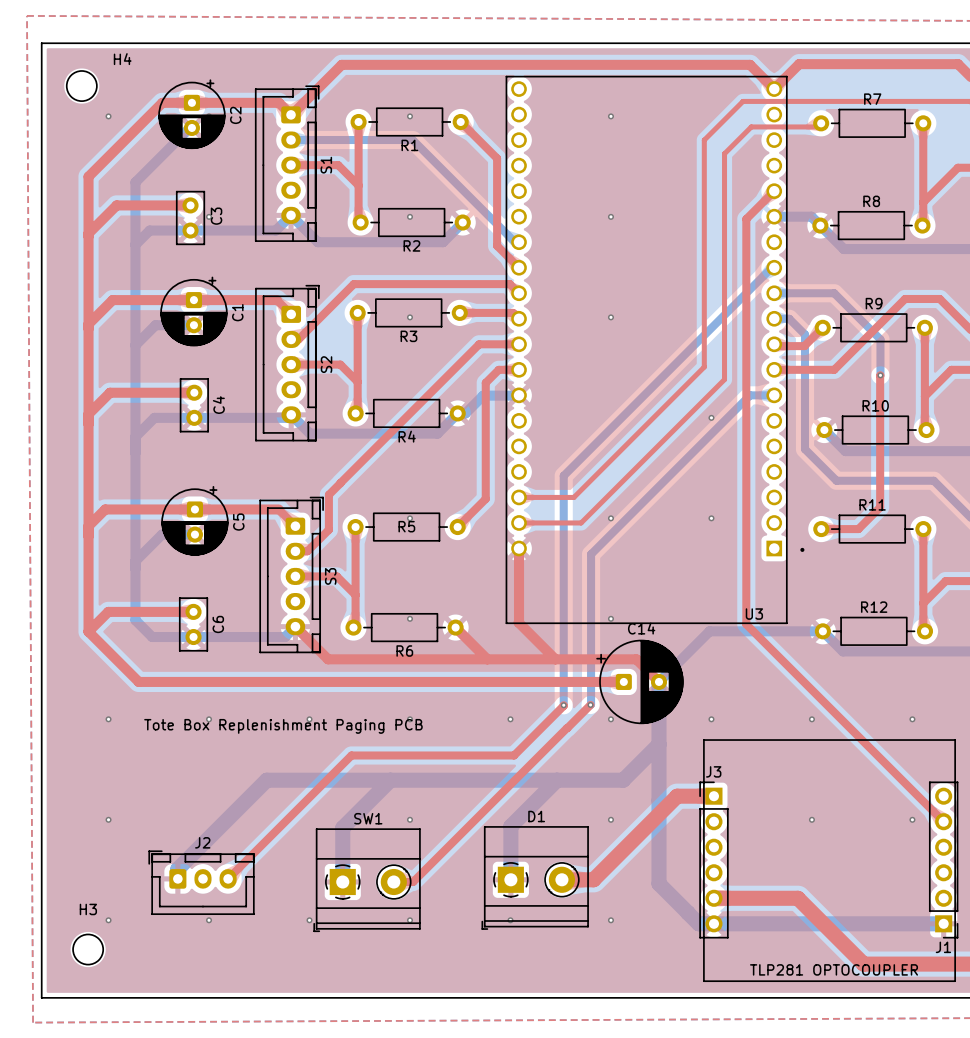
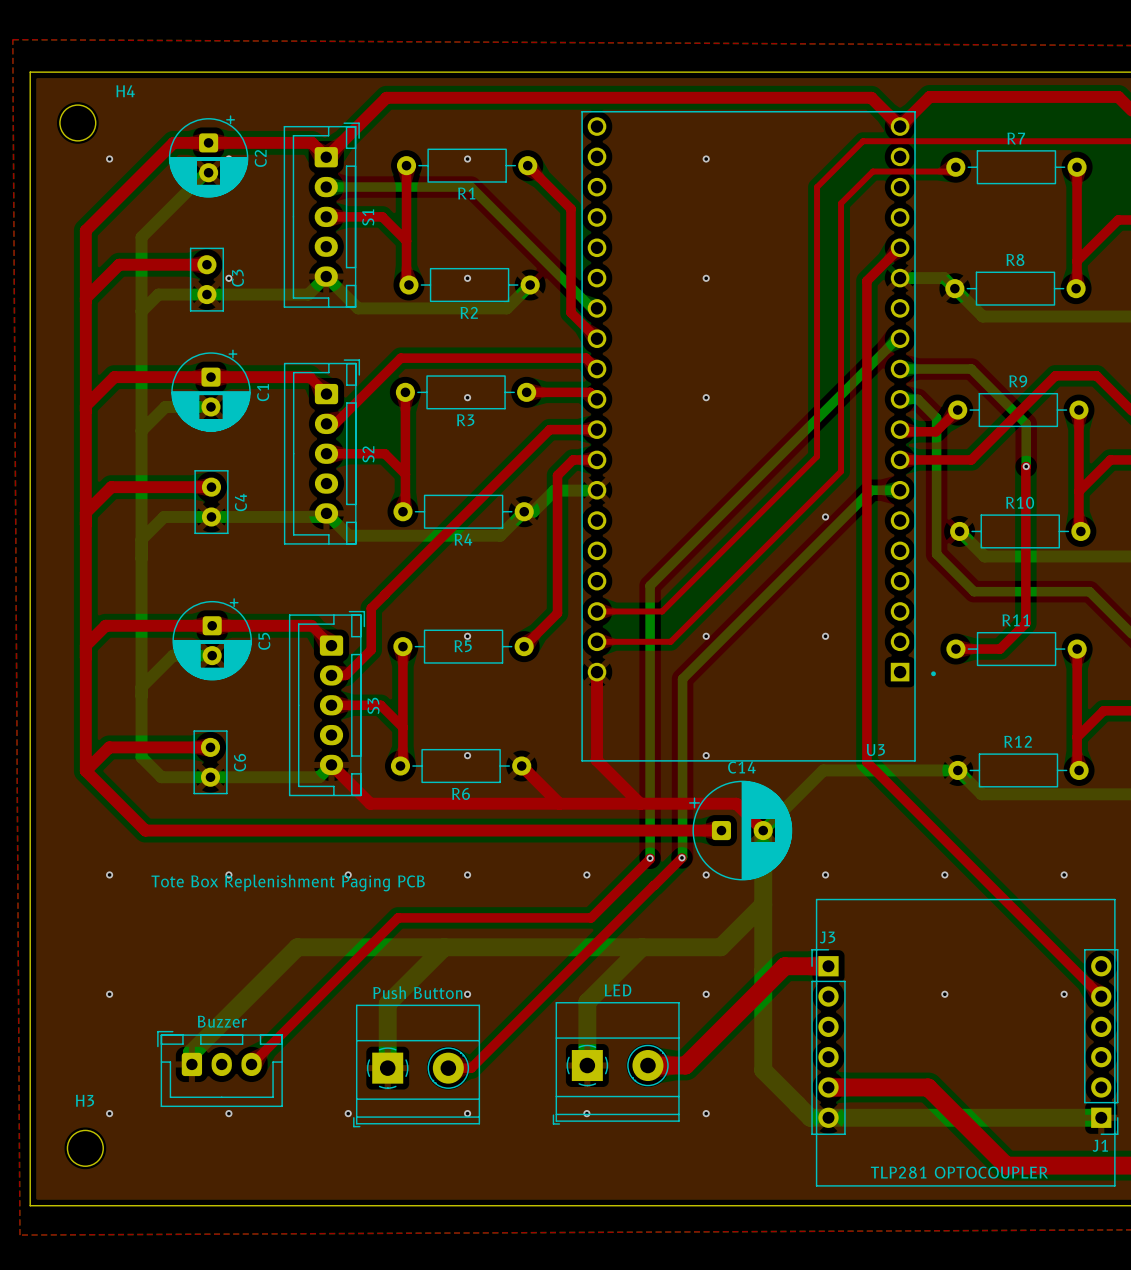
D1 name: D1 (536, 816) -> LED (618, 990)
SW1 name: SW1 (368, 818) -> Push Button (417, 992)
J2 name: J2 (202, 842) -> Buzzer (222, 1021)

